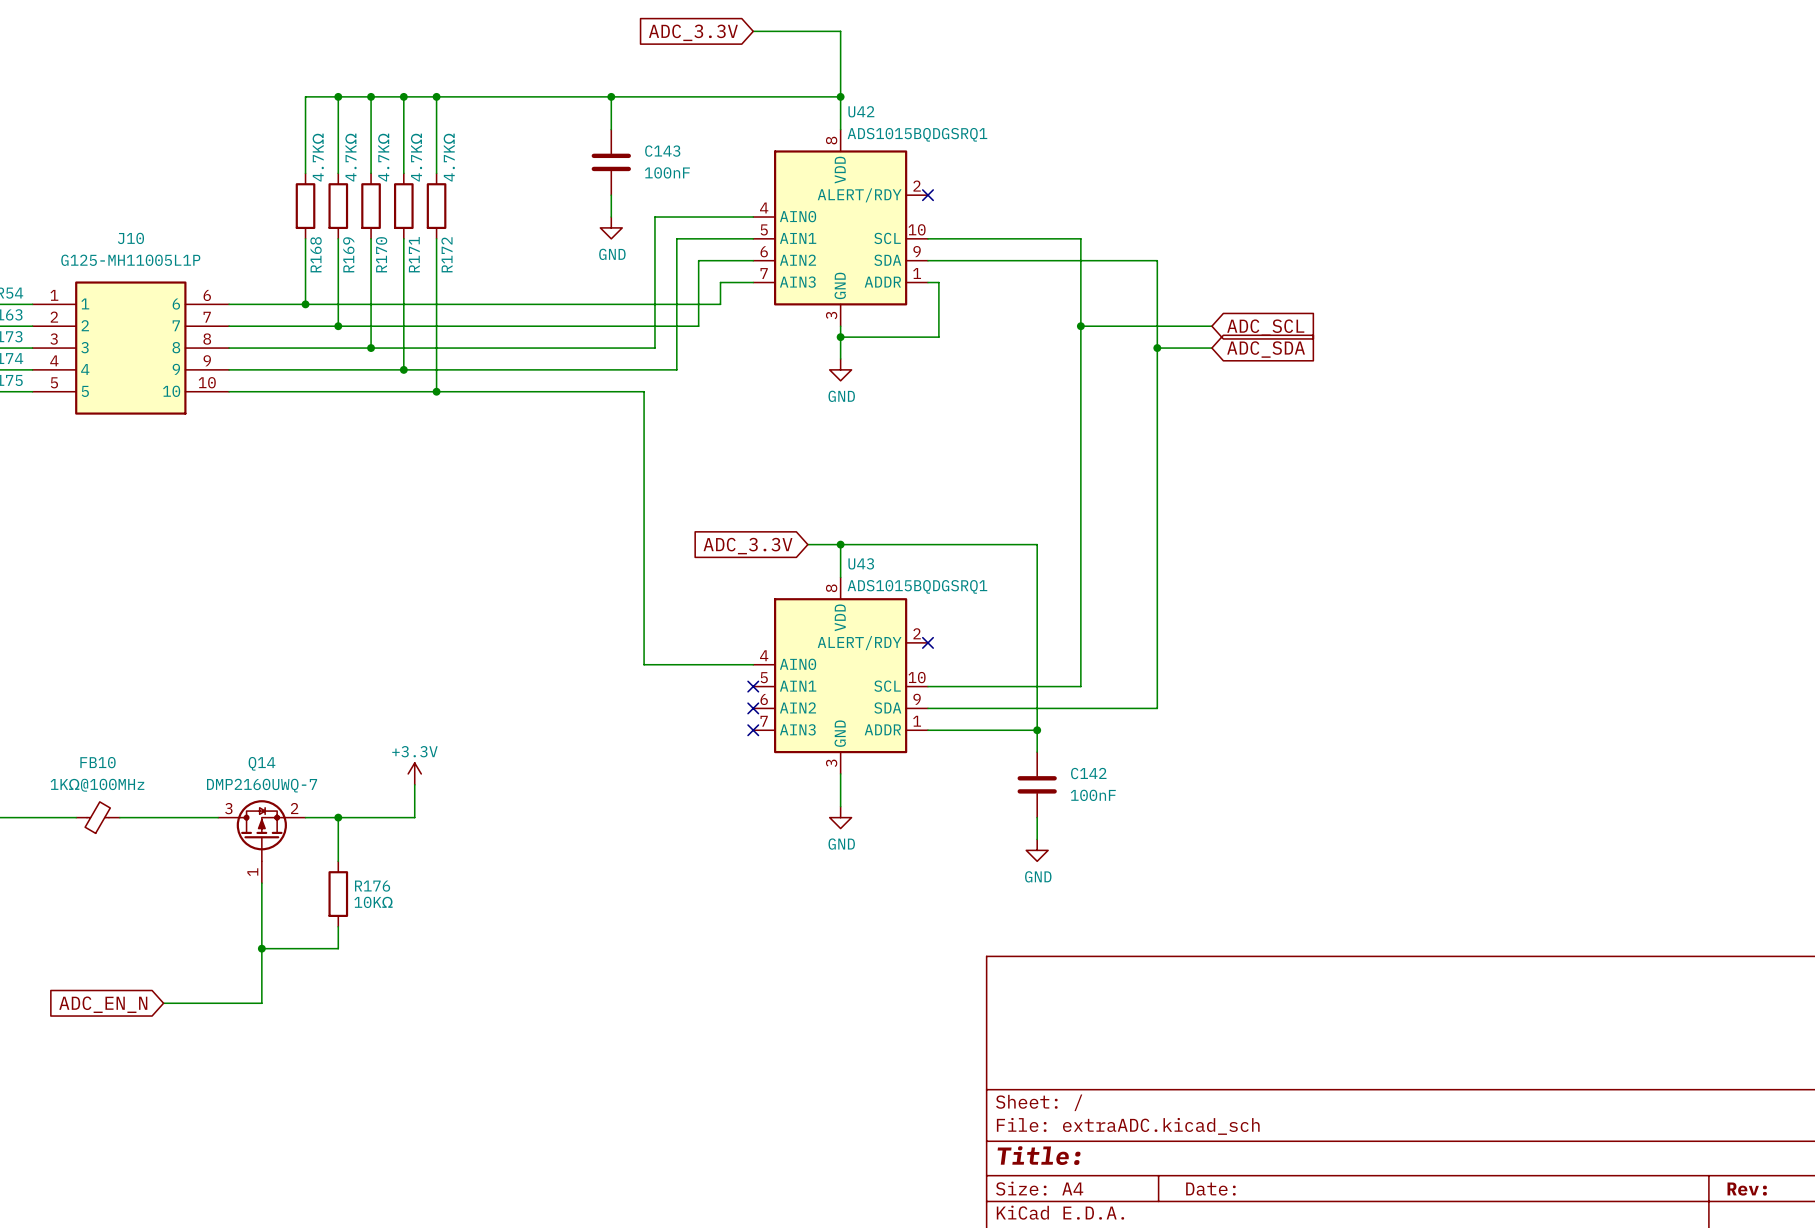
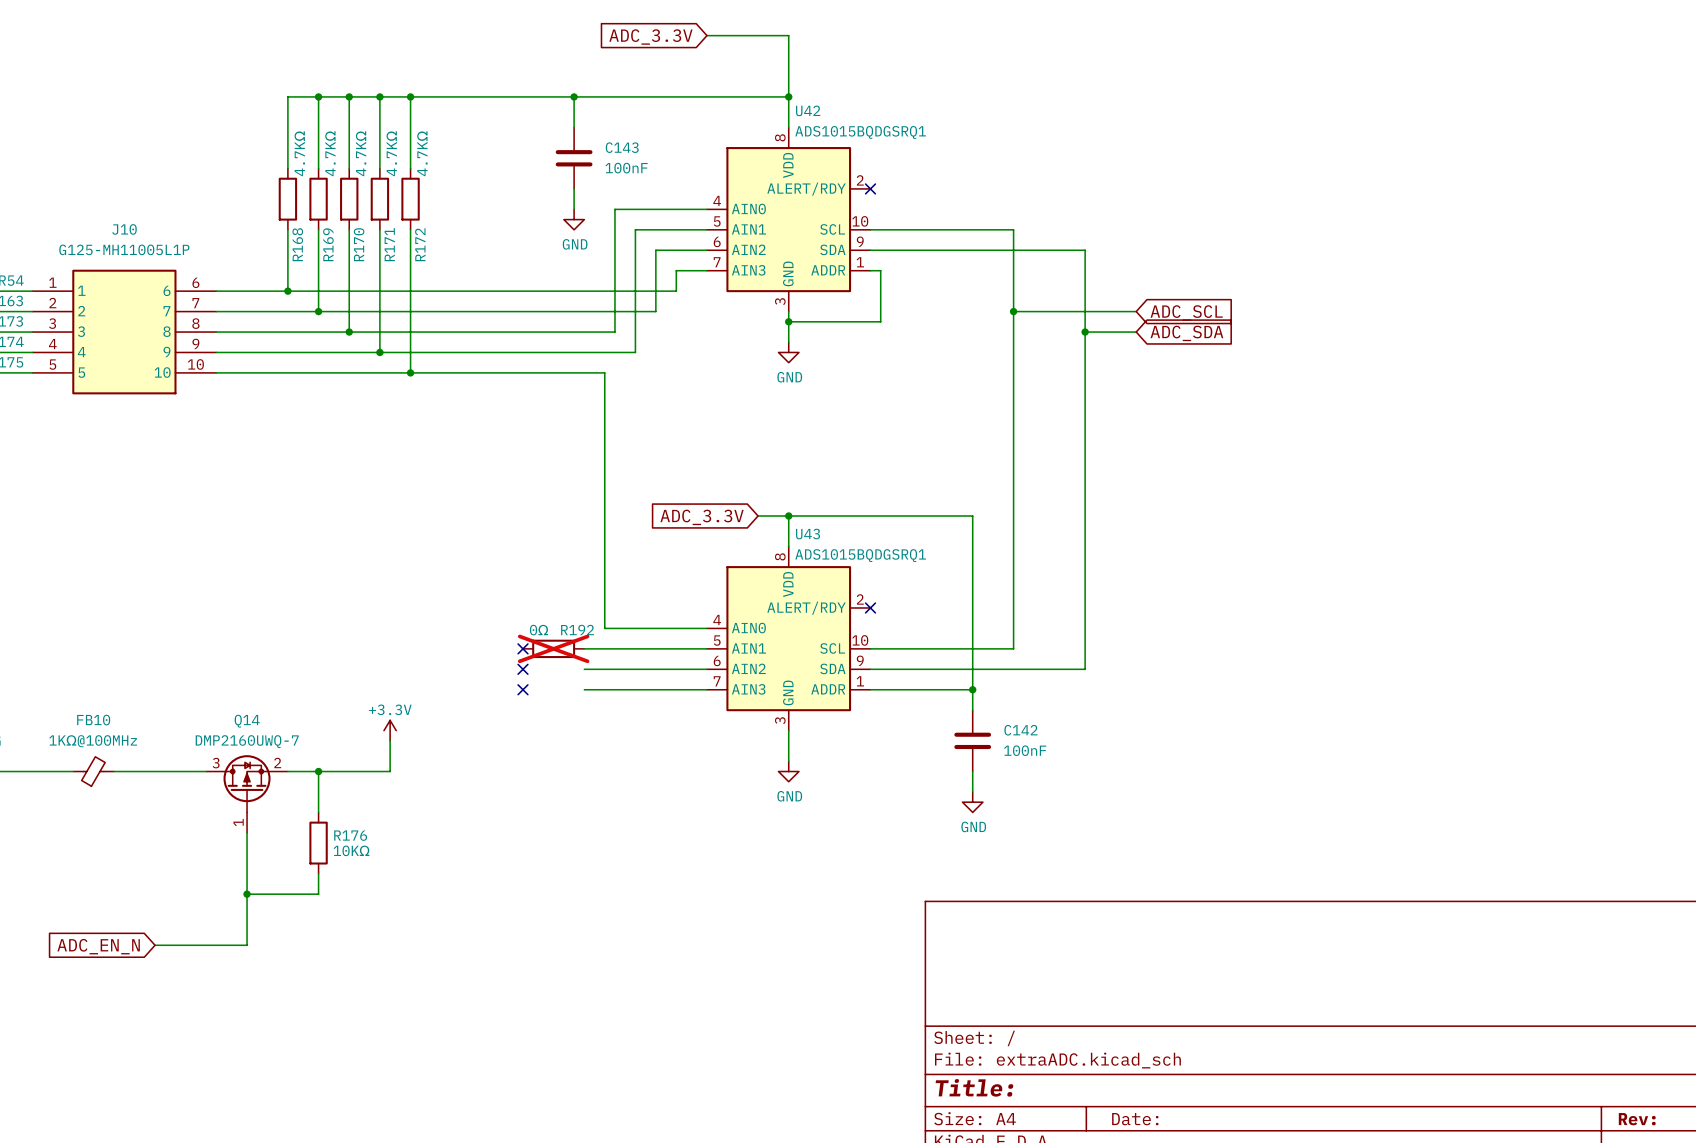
no-connect mark: none -> (522, 648)
R192: none -> 0Ω (553, 648)
wire: none -> (584, 648) (706, 648)
no-connect mark: (753, 686) -> none
no-connect mark: none -> (522, 669)
wire: none -> (584, 669) (706, 669)
no-connect mark: (753, 708) -> none
no-connect mark: none -> (522, 689)
wire: none -> (584, 689) (706, 689)
no-connect mark: (753, 730) -> none

